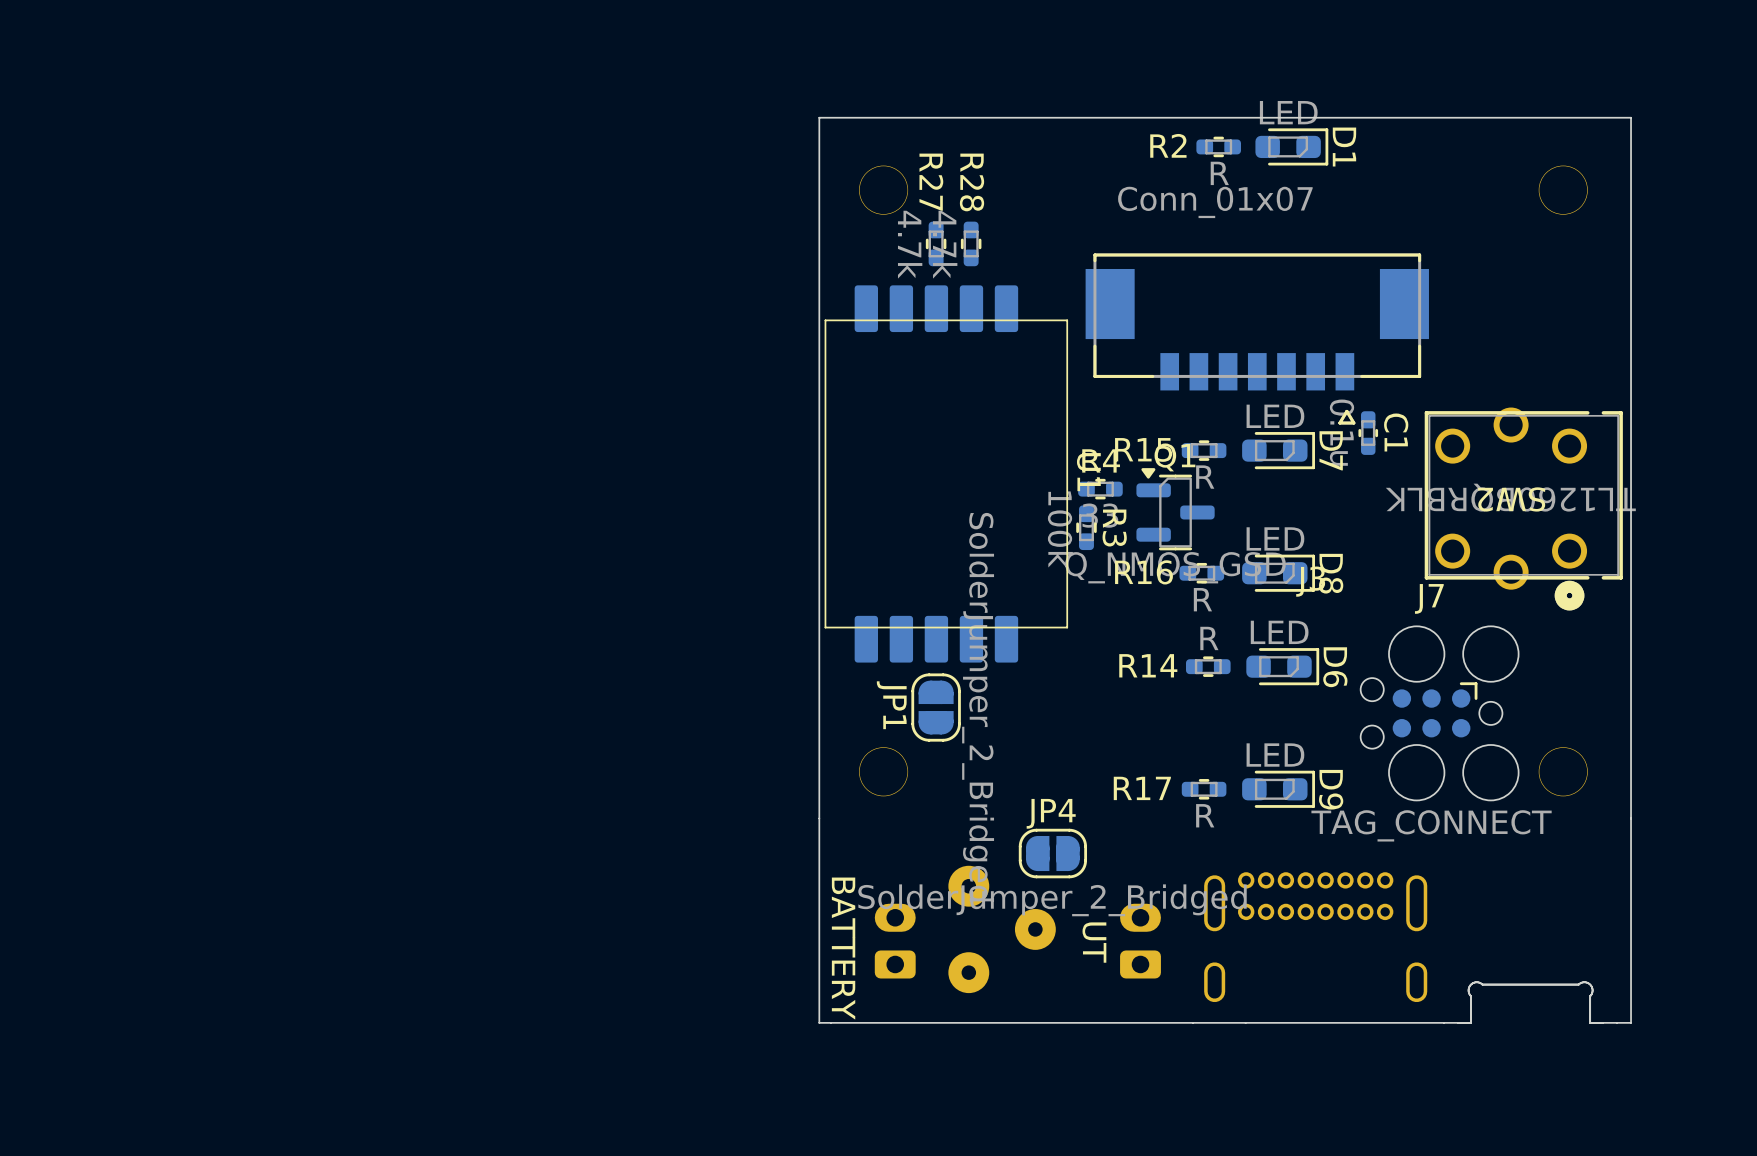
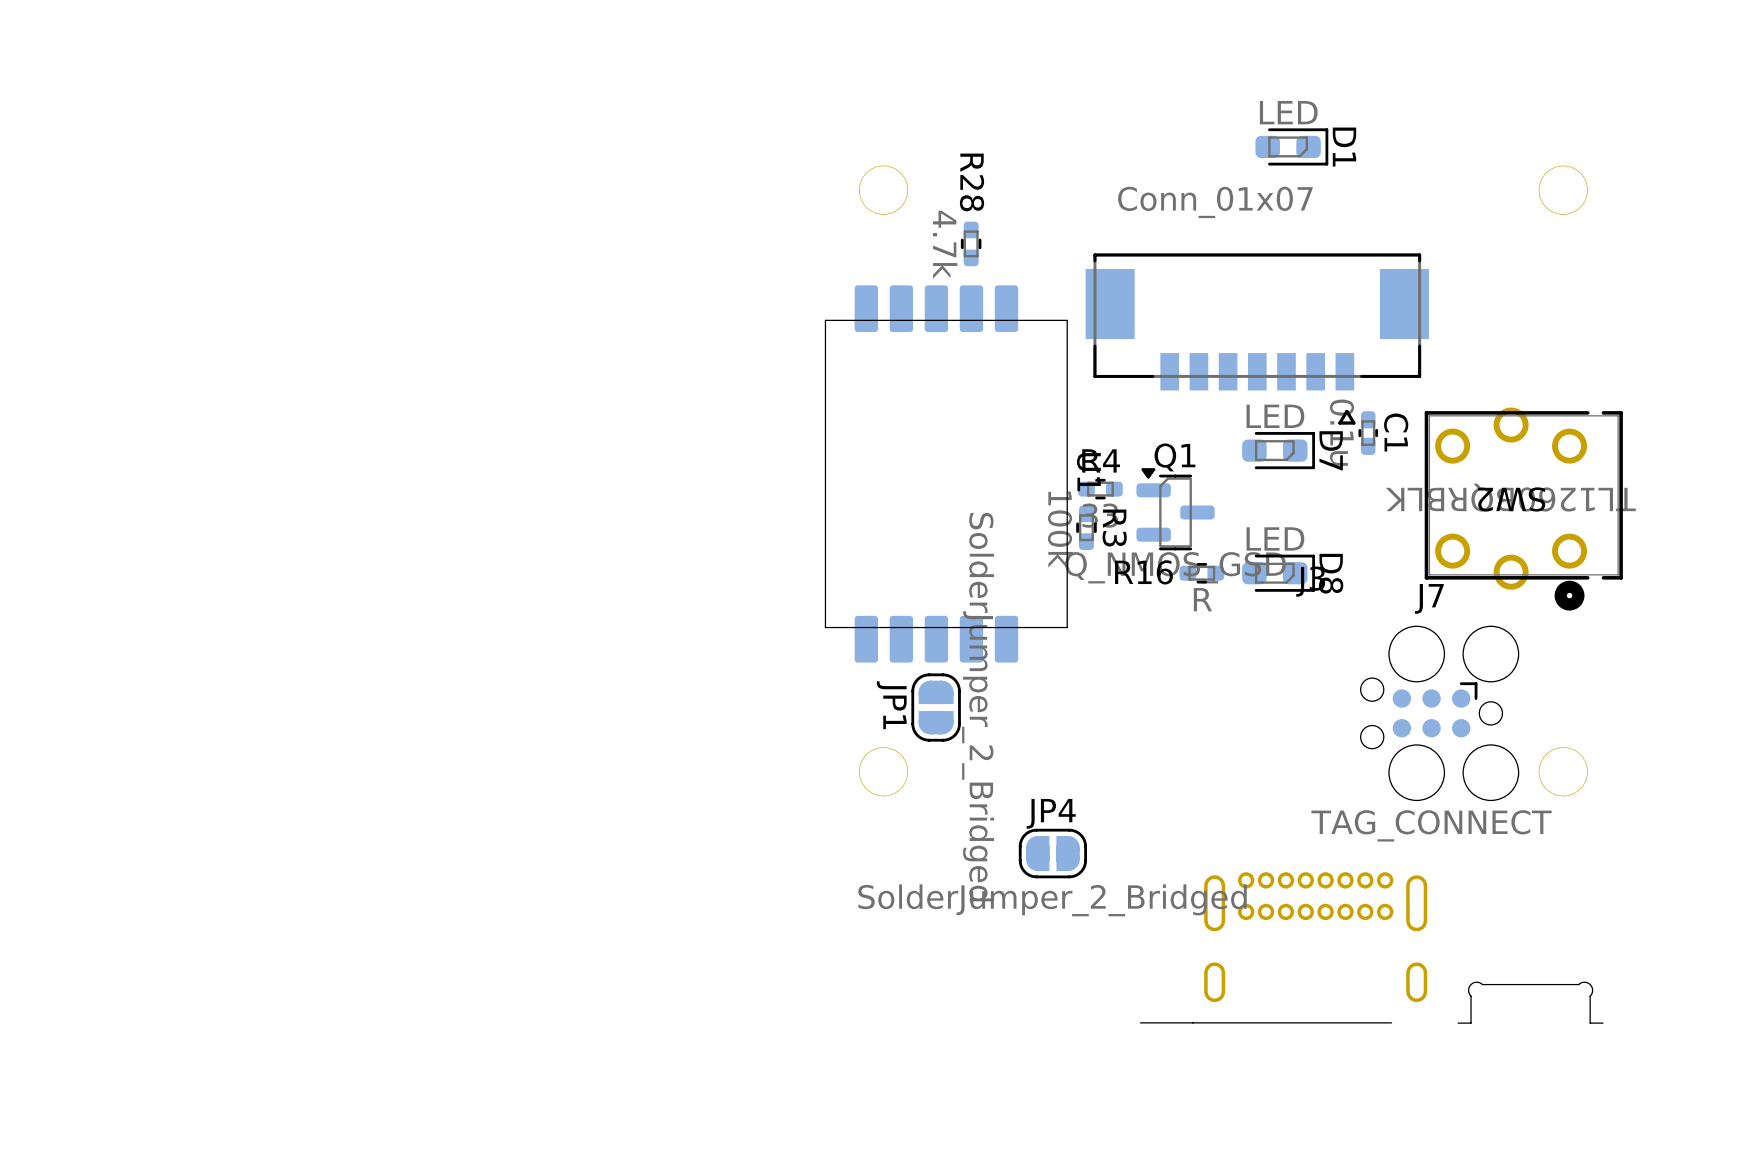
R2: R (1218, 146) -> none
R27: 4.7k (936, 243) -> none
R15: R (1204, 450) -> none
R14: R (1208, 666) -> none
D6: LED (1282, 666) -> none
R17: R (1204, 789) -> none
D9: LED (1278, 789) -> none
part: (1002, 929) -> none
BATTERY: (895, 941) -> none
UT: (1140, 941) -> none
board edge: (1391, 1022) (1471, 1022) (1471, 996) (1468, 989) (1471, 983) (1476, 982) (1482, 984) (1578, 984) (1586, 982) (1592, 990) (1590, 996) (1590, 1022) (1631, 1022) (1631, 117) (819, 117) (819, 1022) (1140, 1022) -> none

